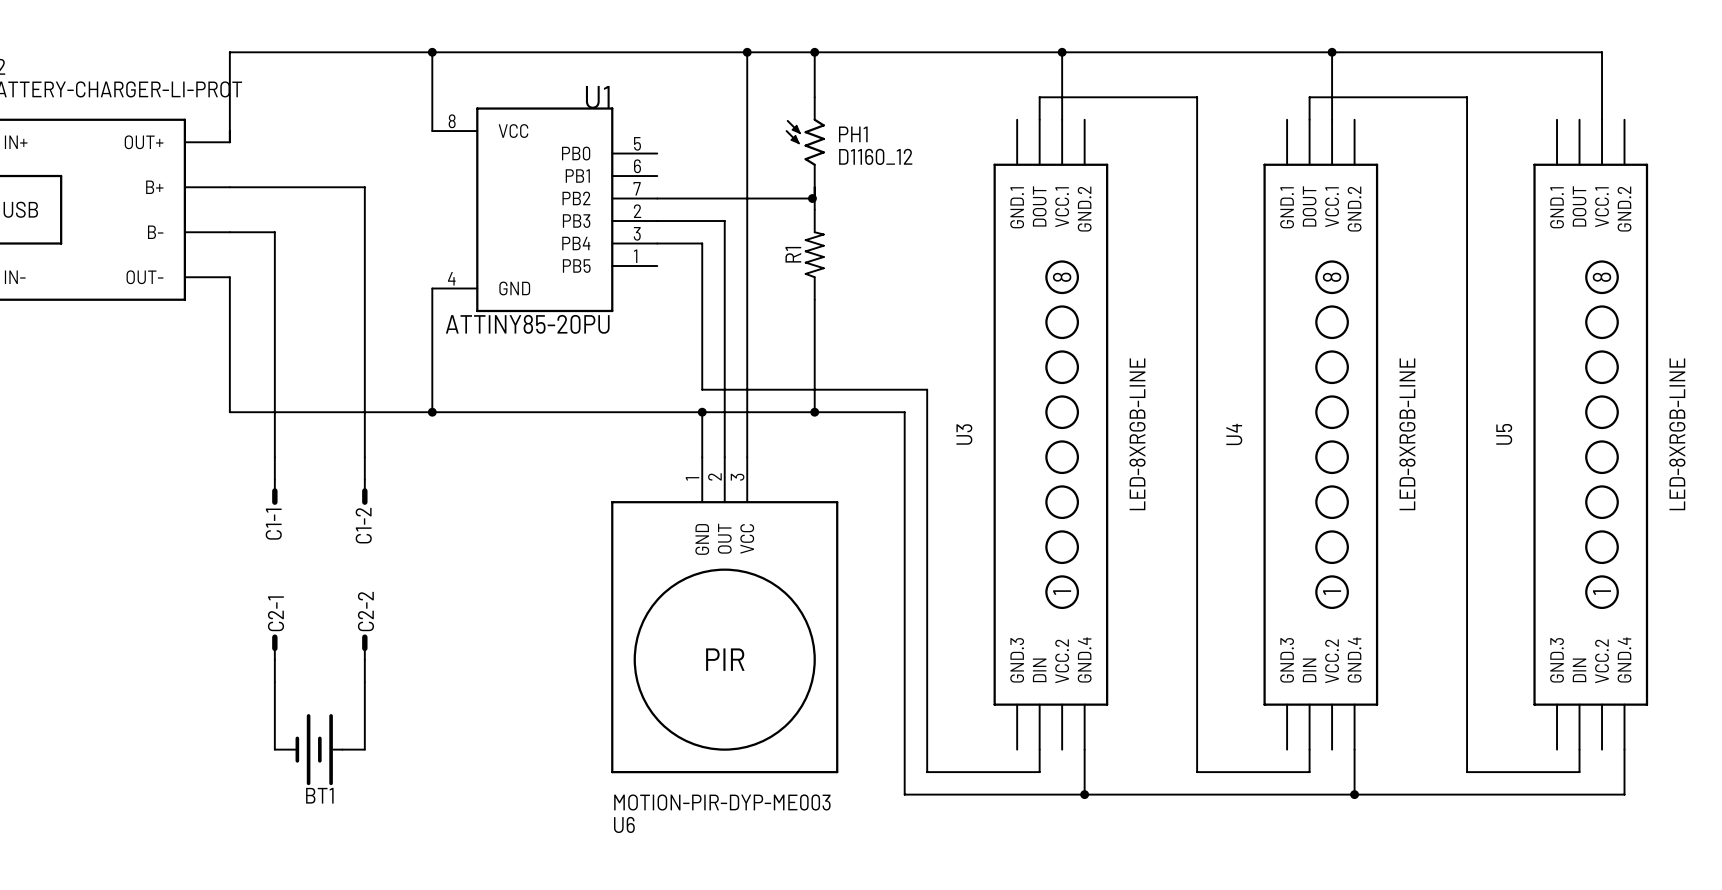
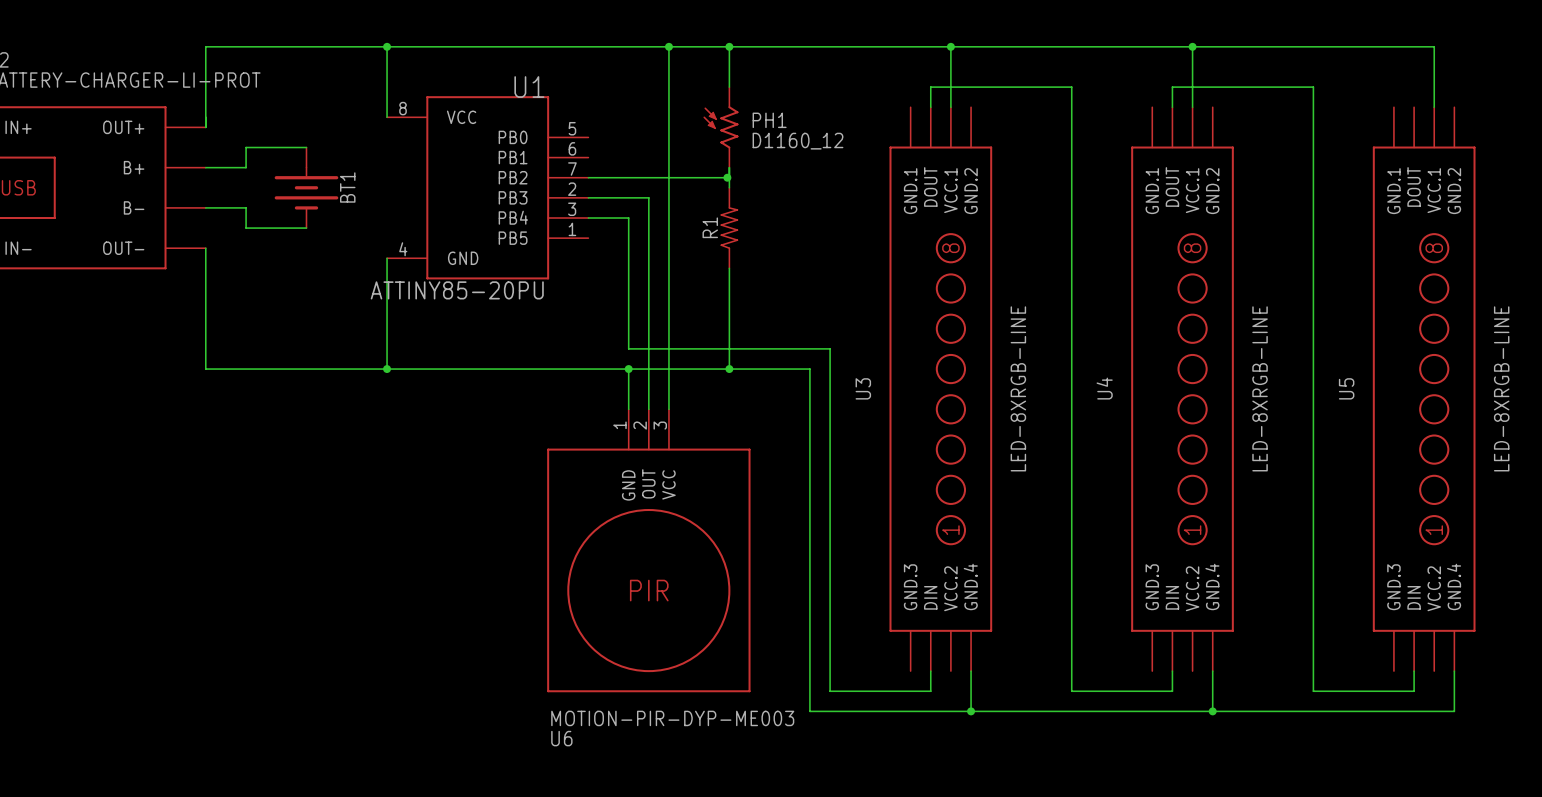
wire: (274, 187) (364, 187) (364, 457) -> (246, 167) (246, 147) (306, 147)
wire: (274, 254) (274, 457) -> (246, 228) (306, 228)
C1-1: (274, 481) -> none
C1-2: (364, 481) -> none
C2-1: (274, 658) -> none
C2-2: (364, 658) -> none
wire: (274, 682) (274, 749) -> none
wire: (364, 682) (364, 749) -> none
BT1 rotation: 0° (319, 749) -> 90° counterclockwise (306, 188)
BT1 position: (319, 749) -> (306, 187)

